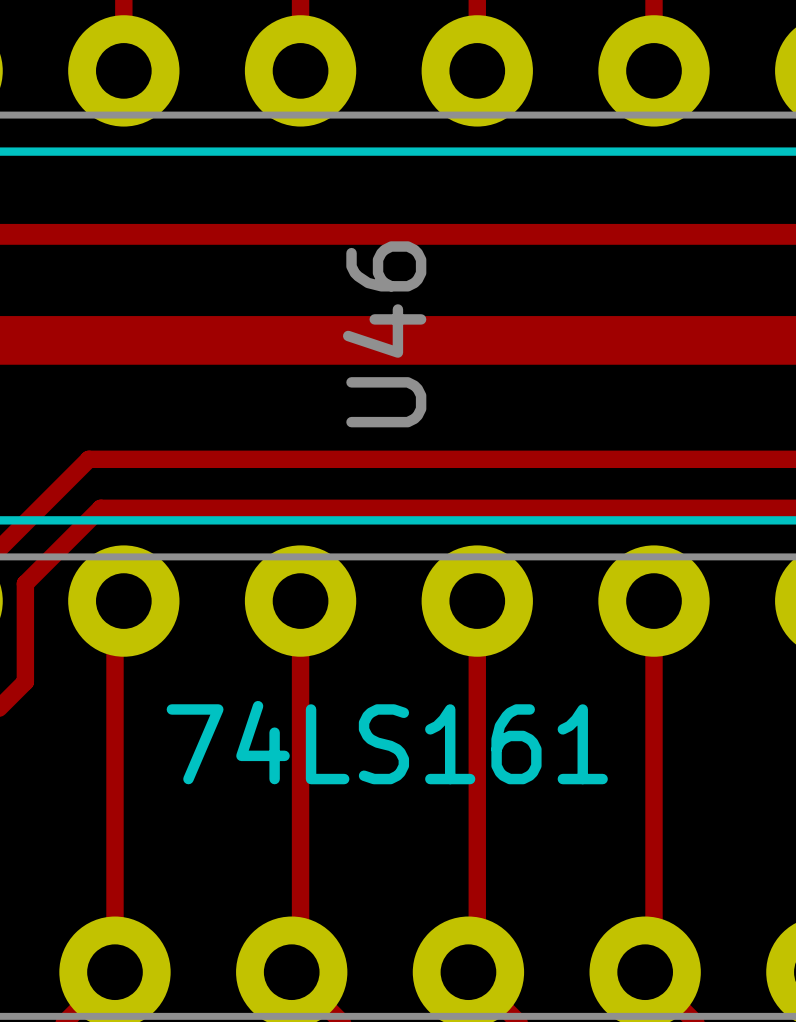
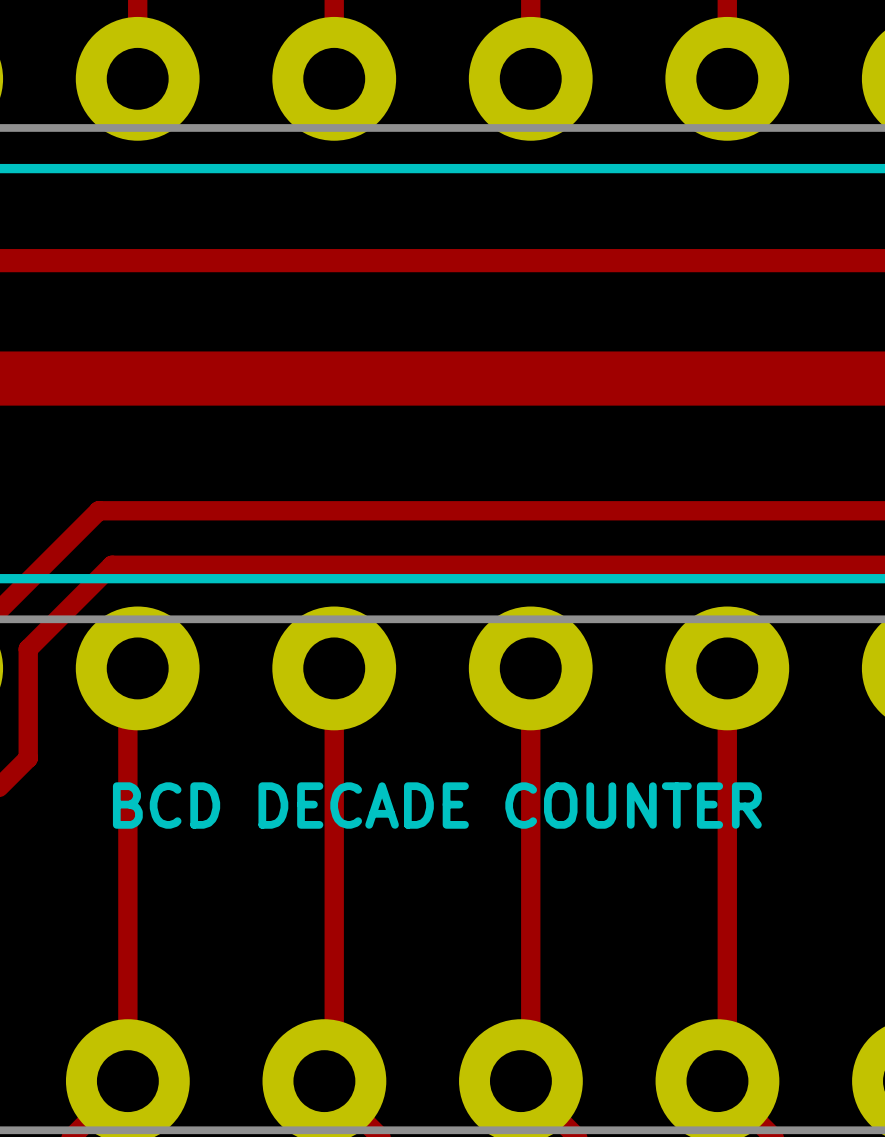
U46 name: U46 (384, 334) -> none
text: 74LS161 (387, 742) -> BCD DECADE COUNTER (437, 805)

